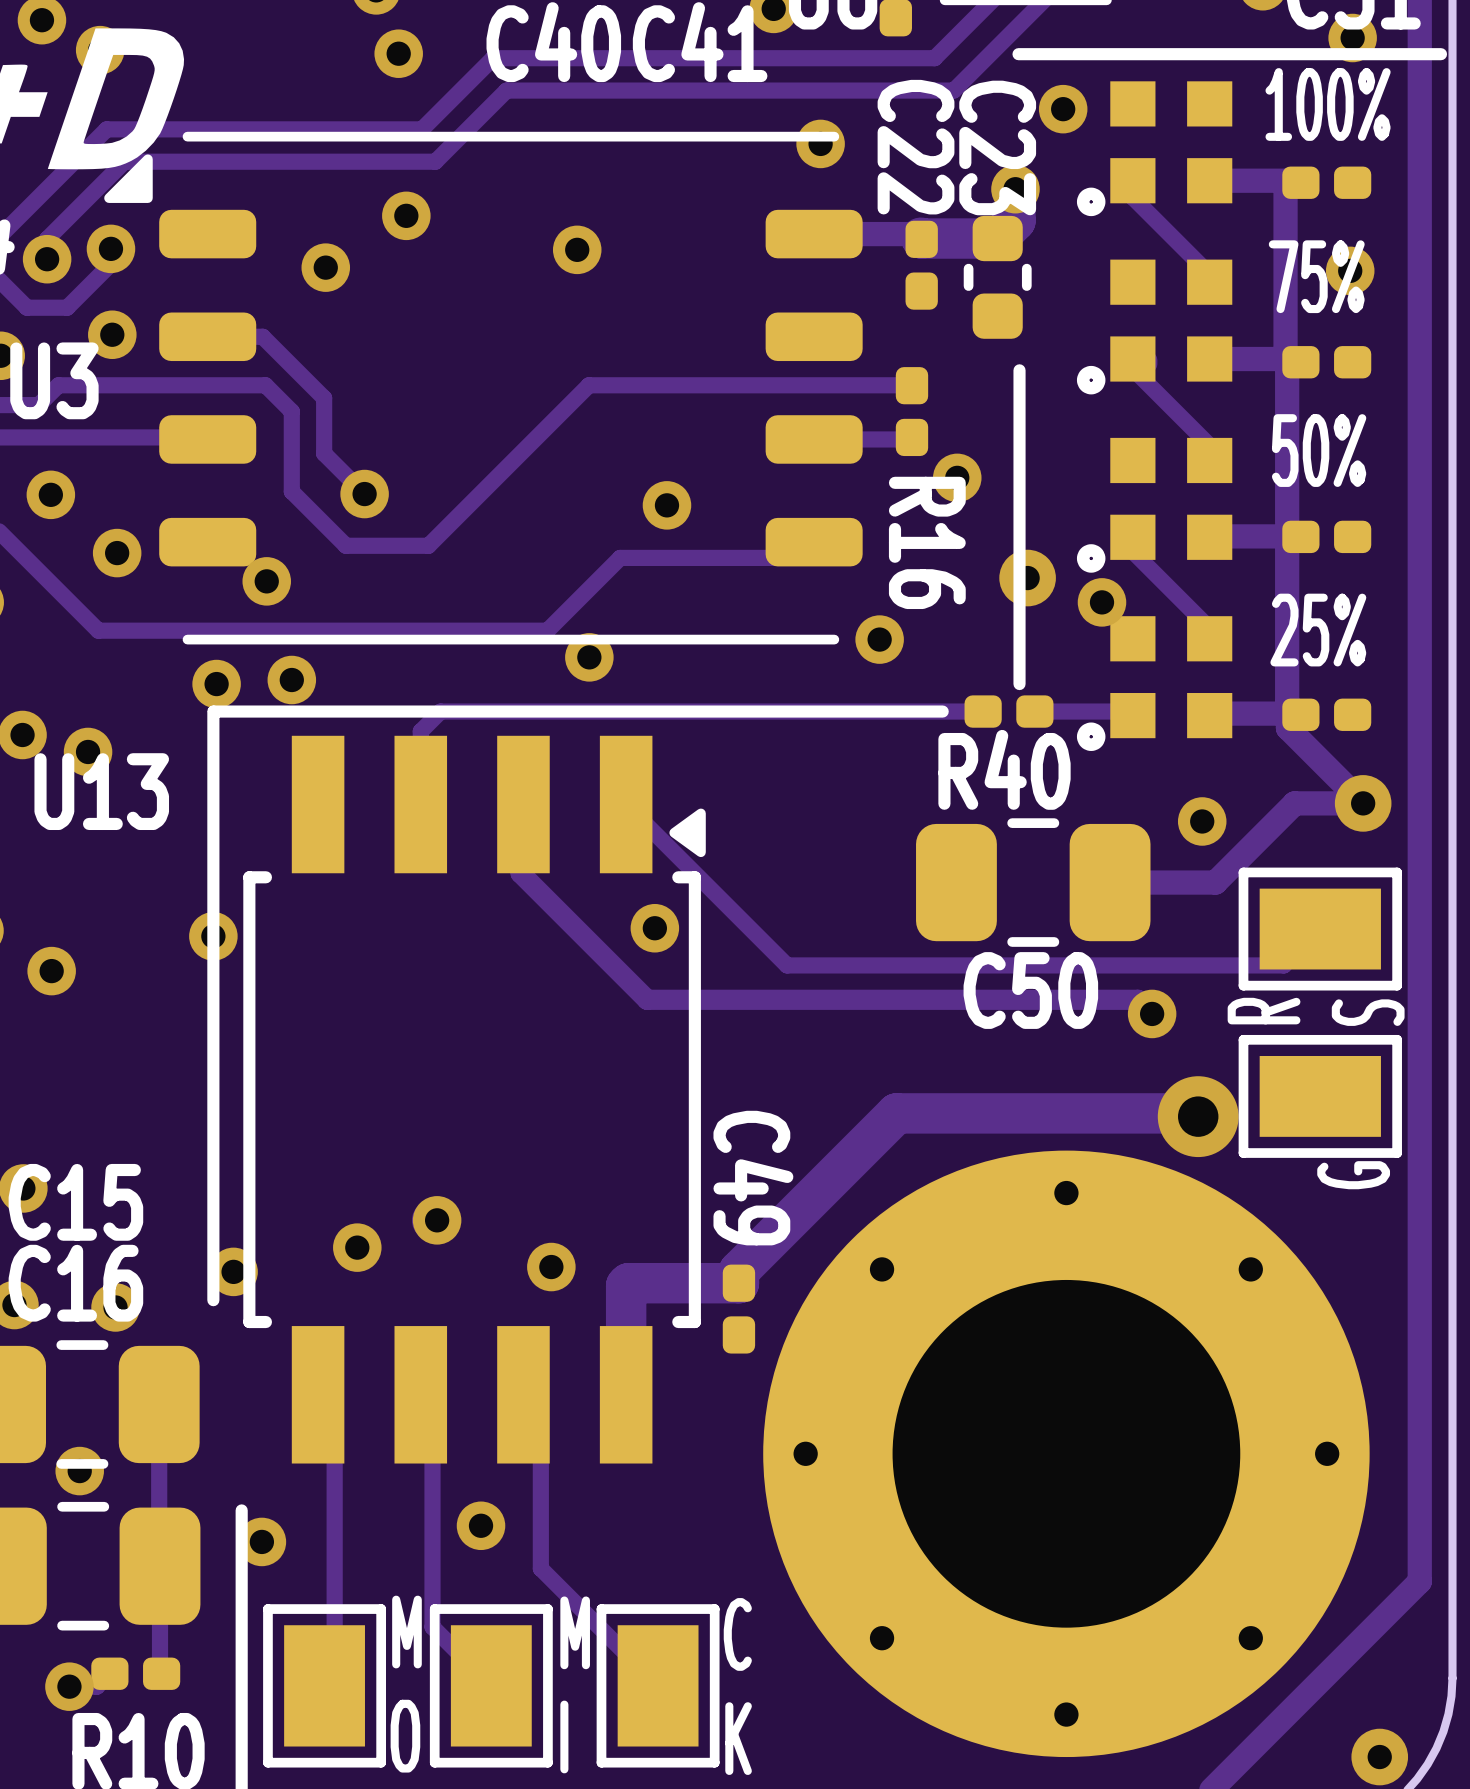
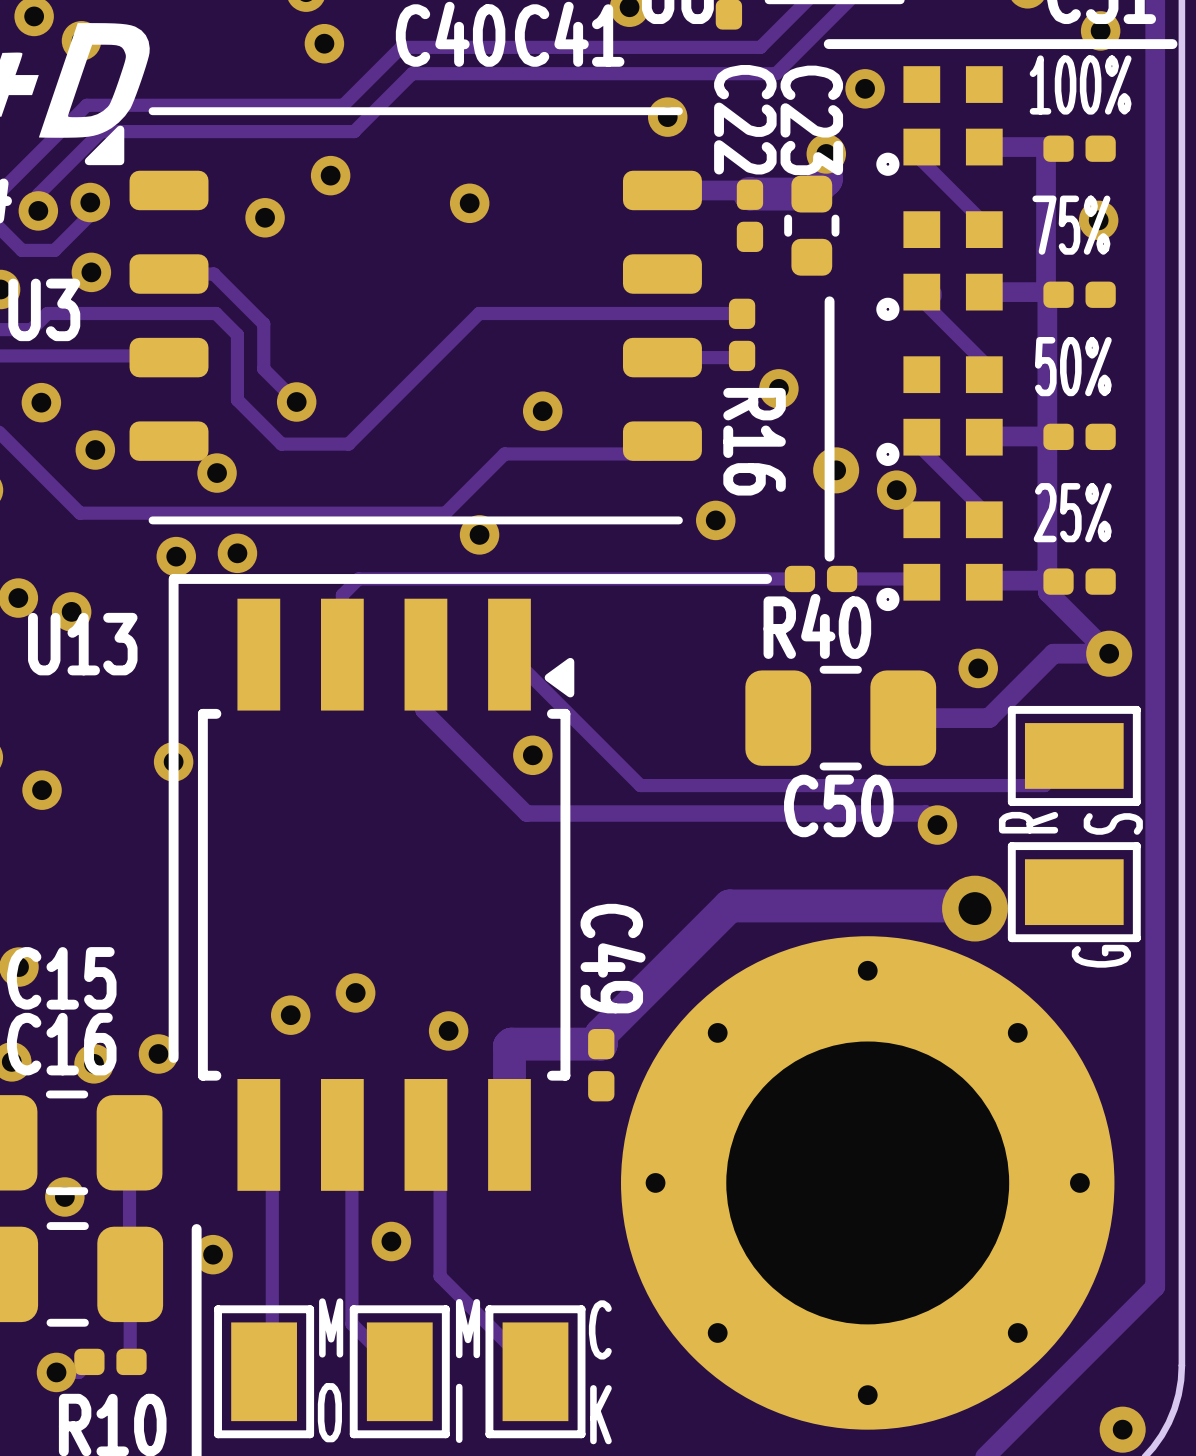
via position: (233, 1271) -> (158, 1053)

